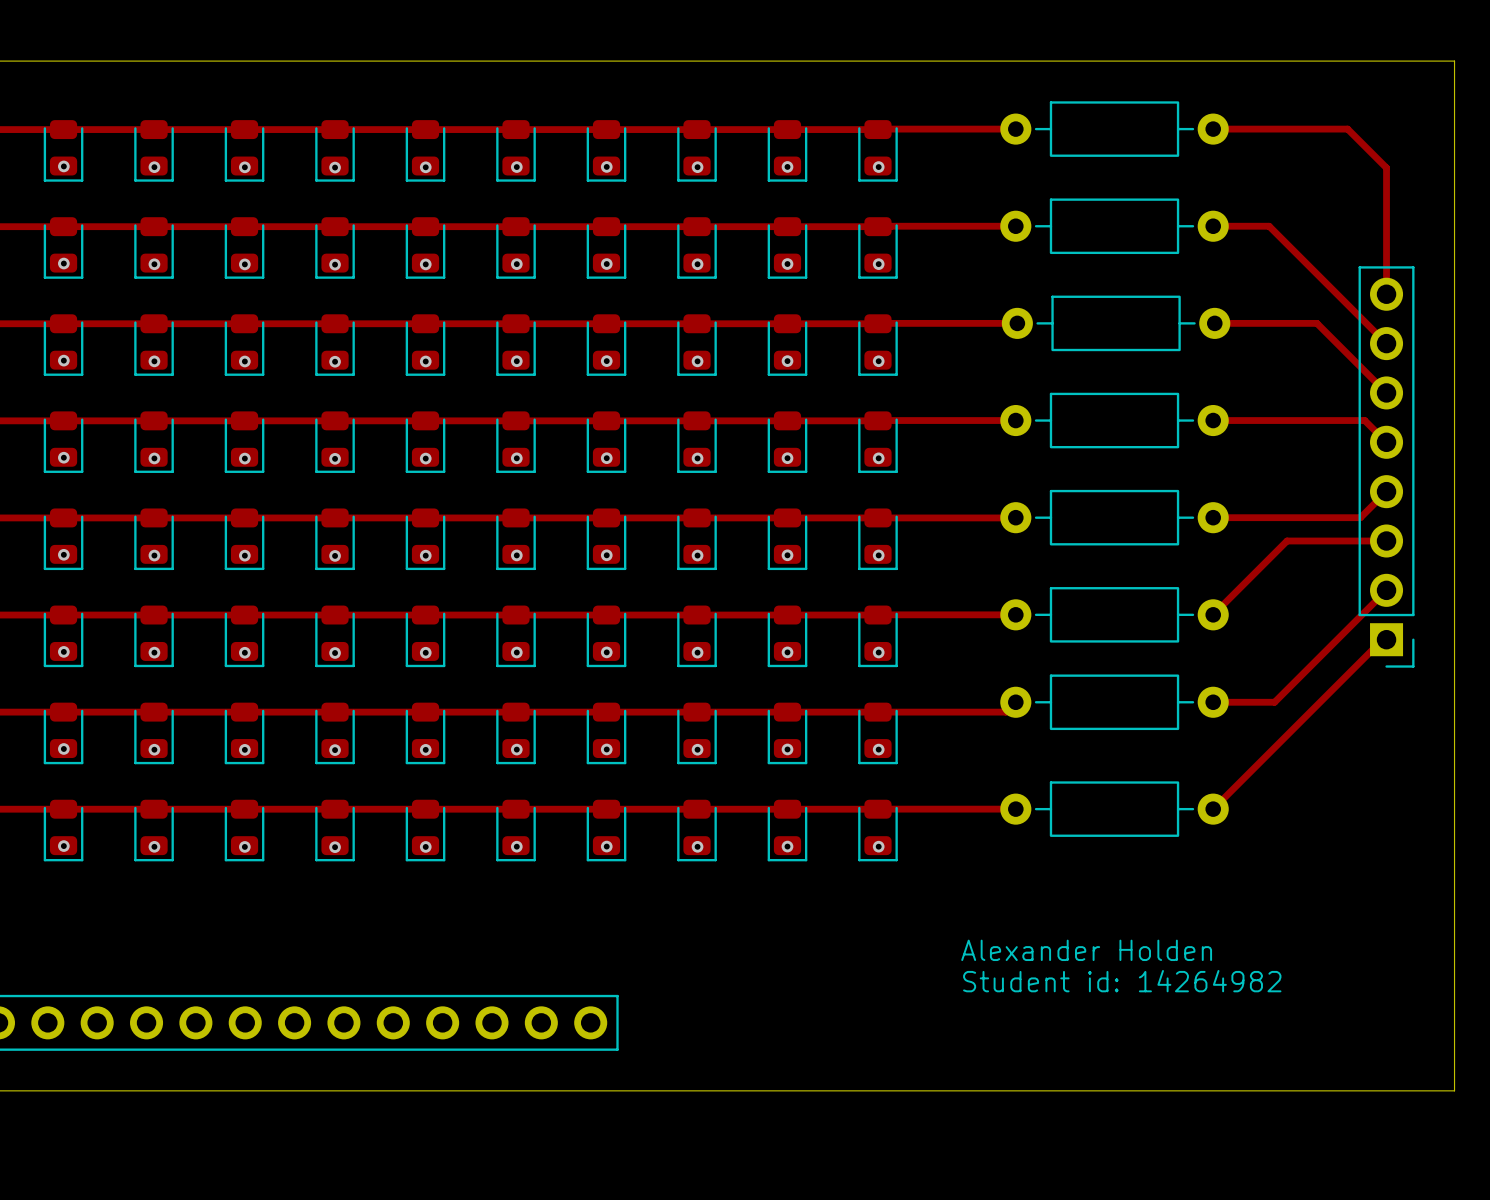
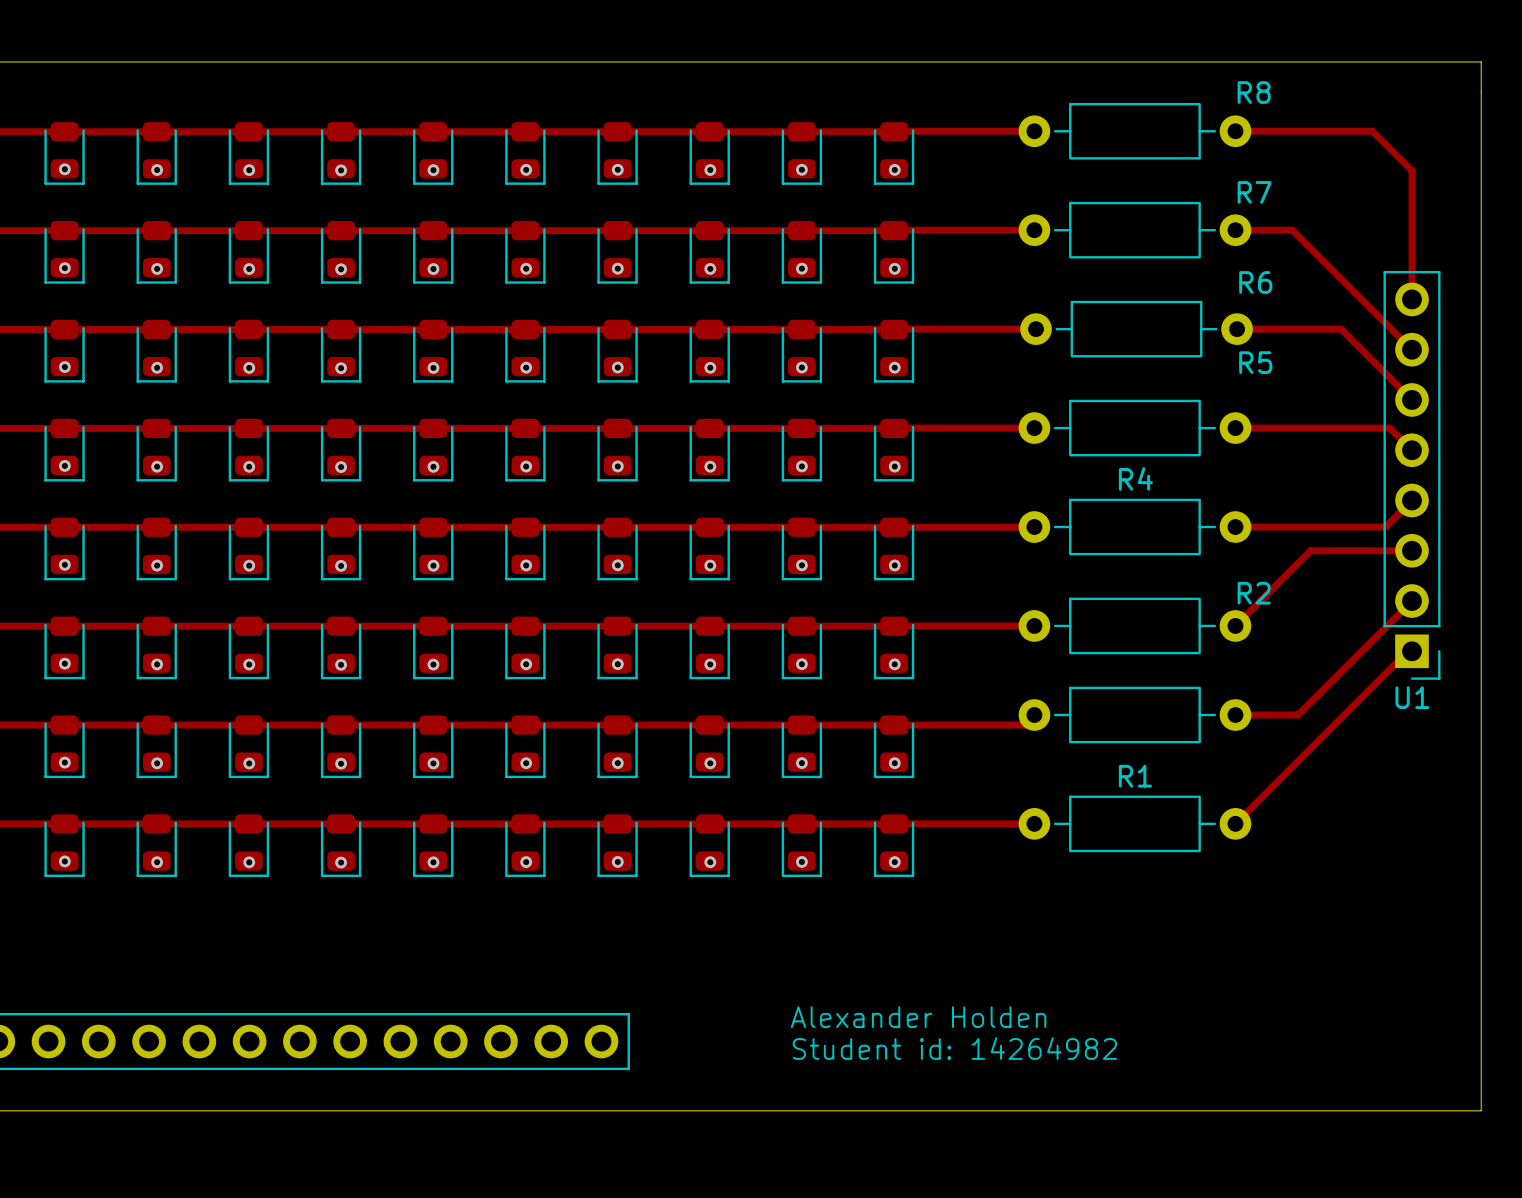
R8 name: none -> R8 (1254, 92)
R7 name: none -> R7 (1254, 192)
R6 name: none -> R6 (1255, 282)
R5 name: none -> R5 (1255, 362)
R4 name: none -> R4 (1135, 478)
R2 name: none -> R2 (1254, 593)
U1 name: none -> U1 (1412, 697)
R1 name: none -> R1 (1135, 776)
text position: Alexander Holden (1086, 950) -> Alexander Holden (918, 1017)
text position: Student id: 14264982 (1122, 981) -> Student id: 14264982 (954, 1048)

